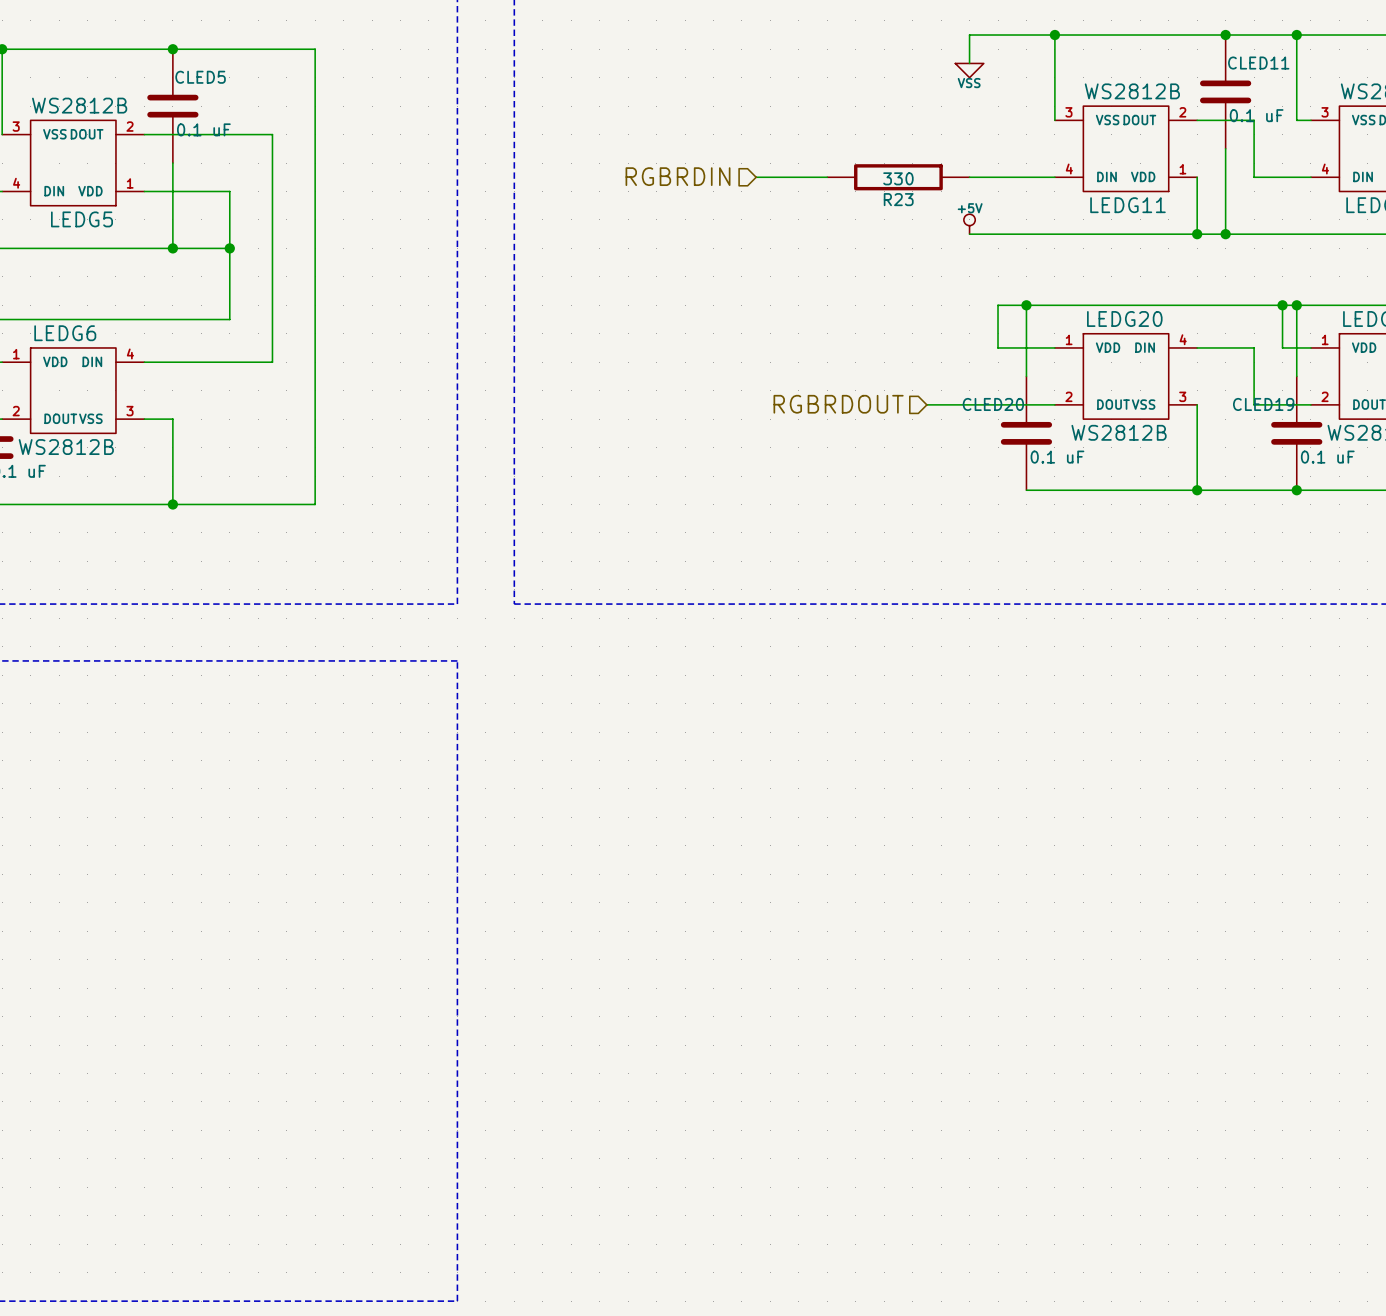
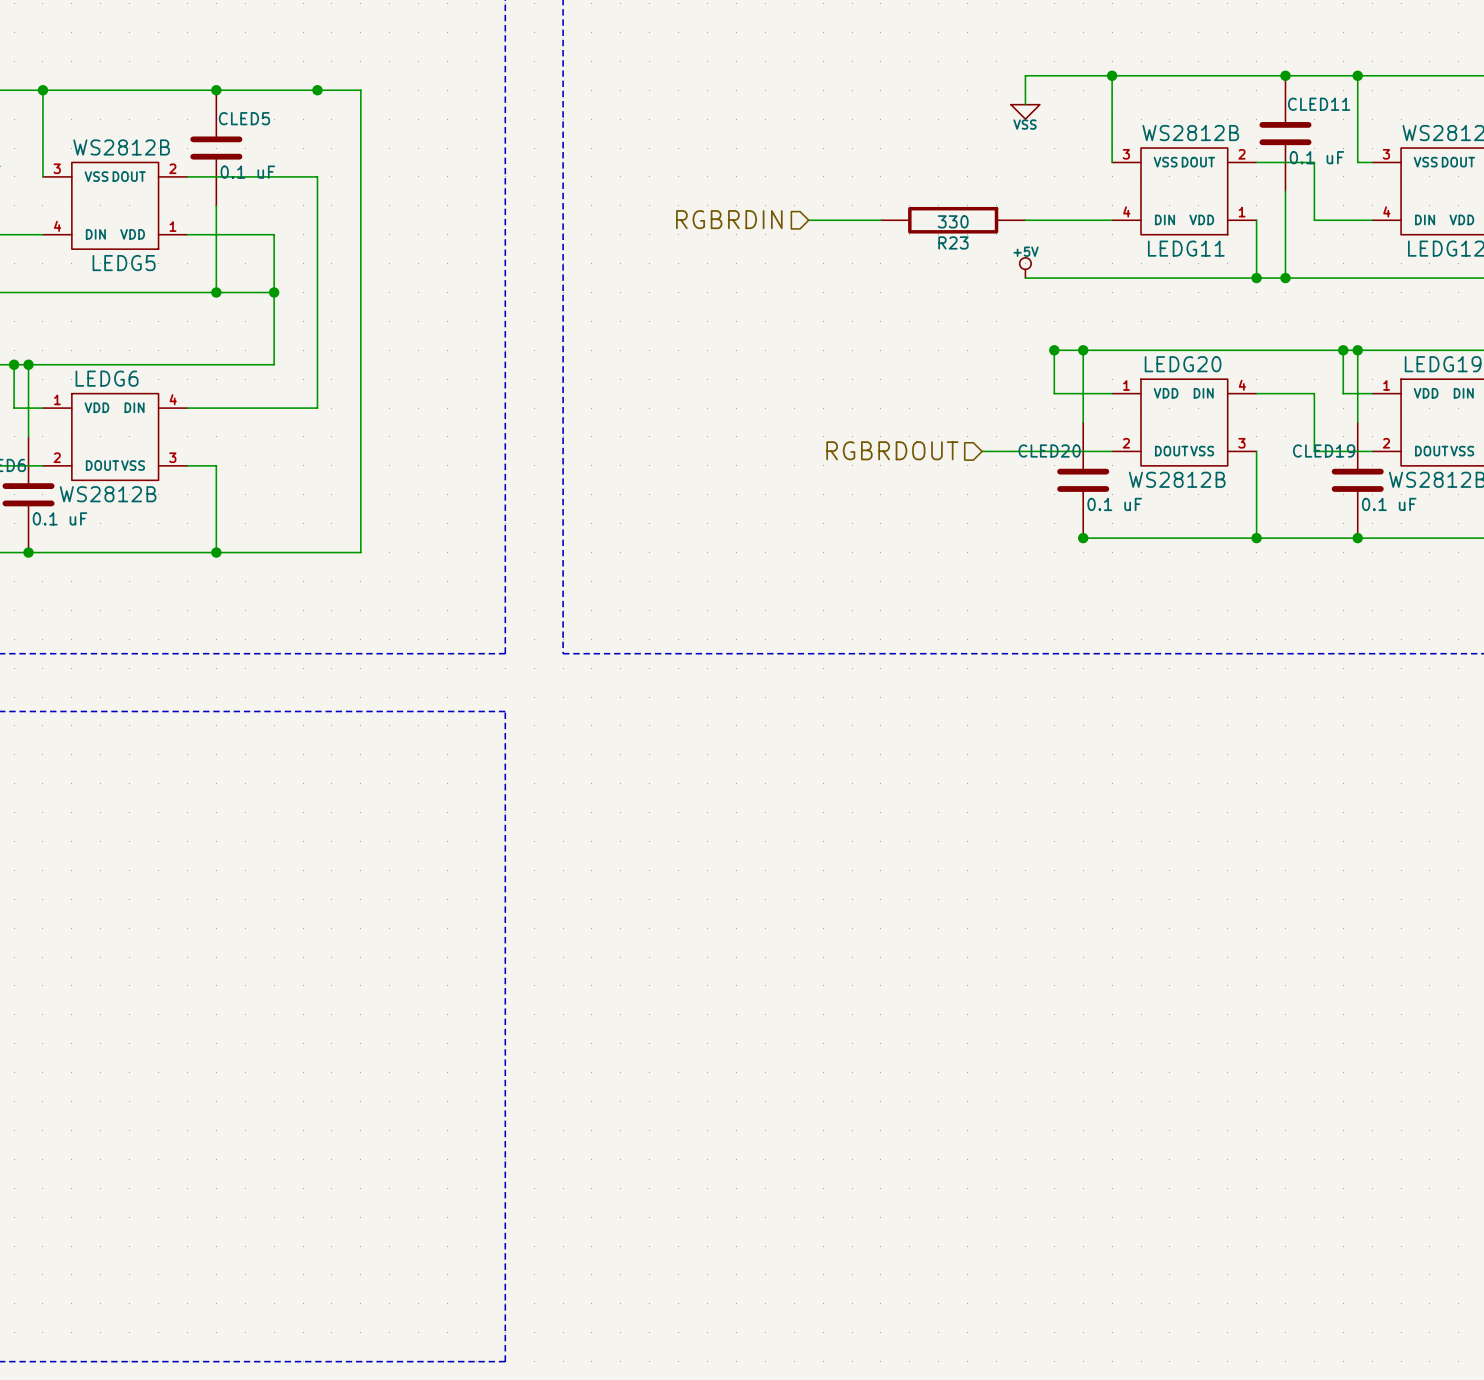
junction: none -> (317, 90)
junction: none -> (1054, 350)
junction: none -> (1083, 538)

